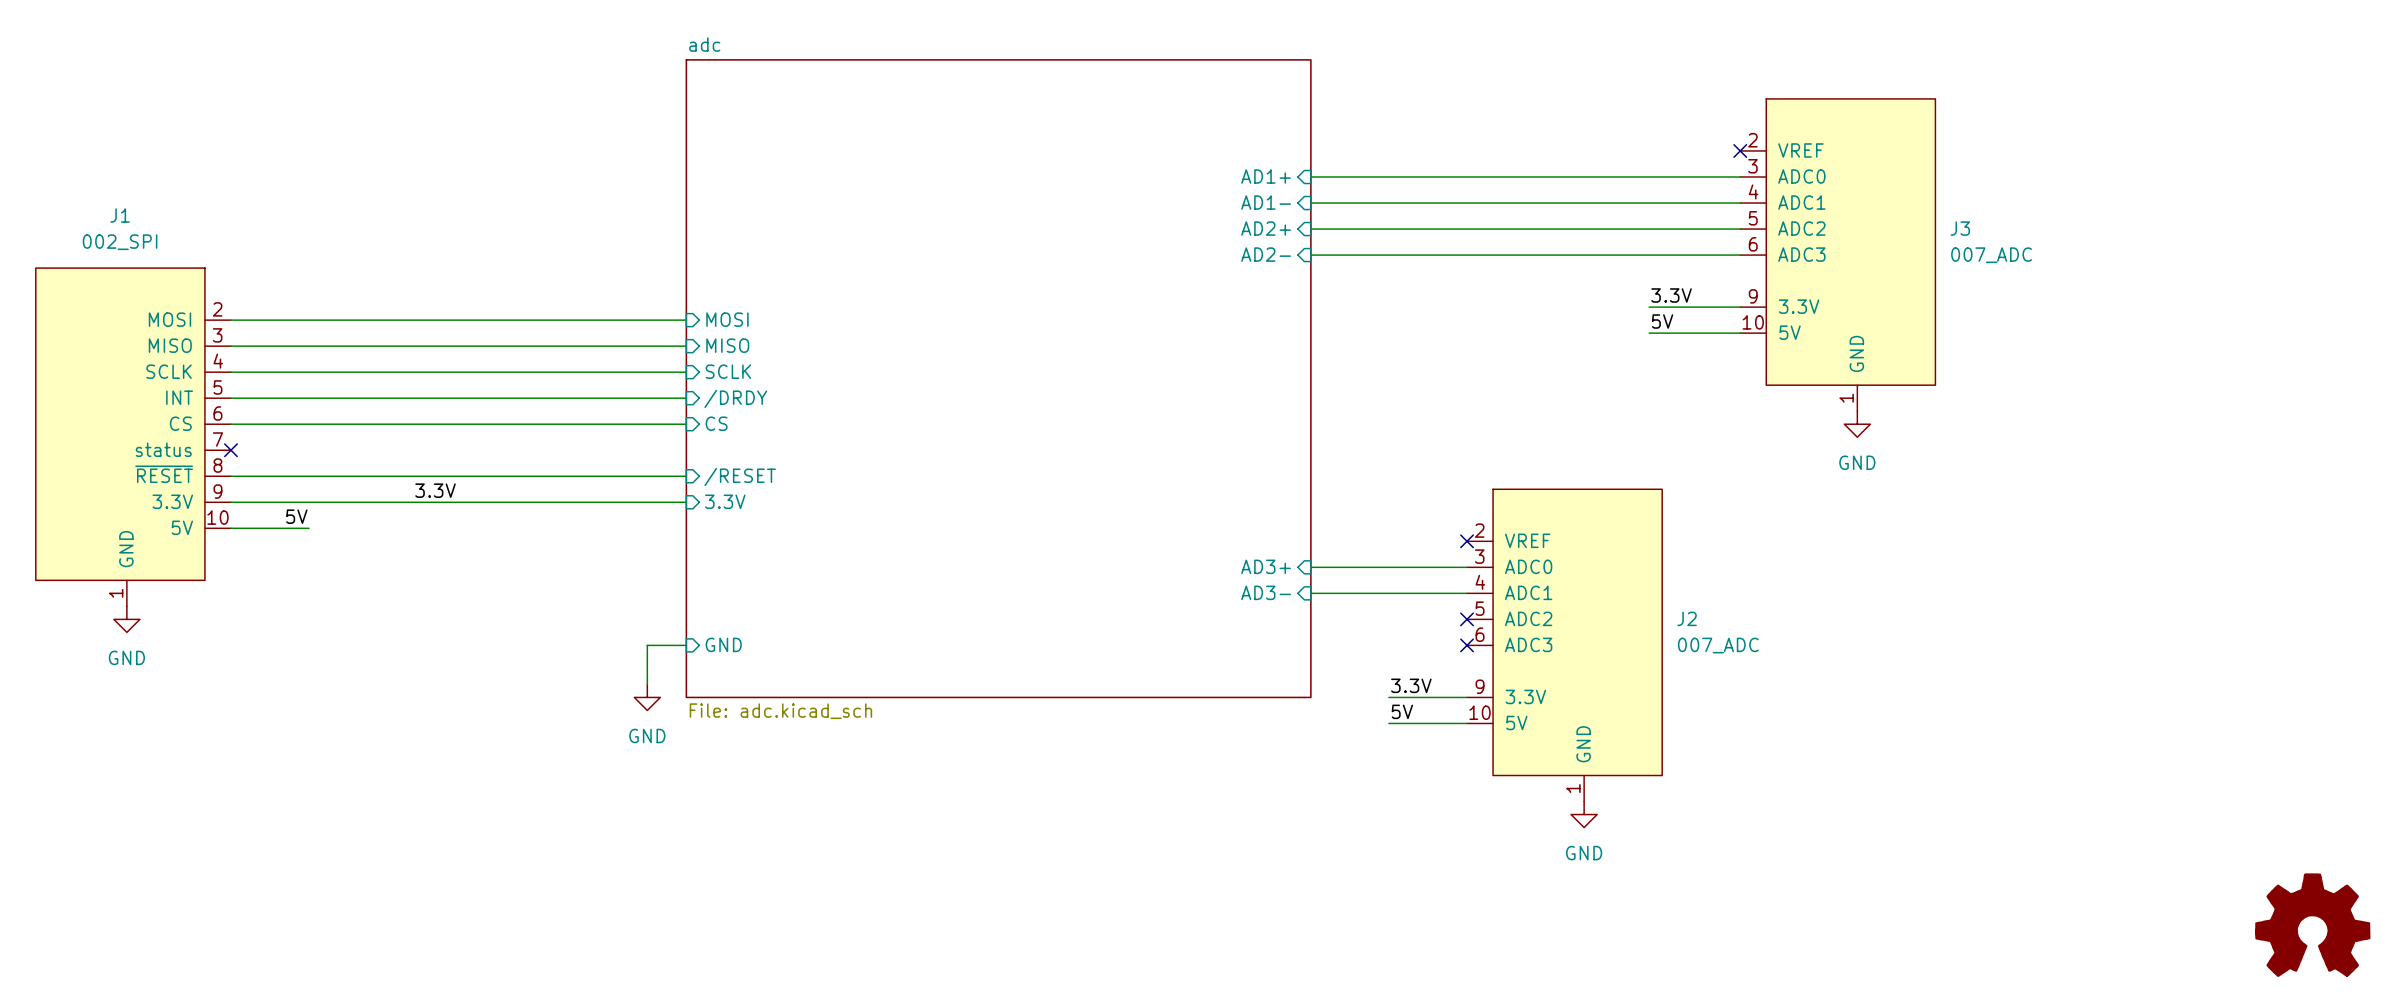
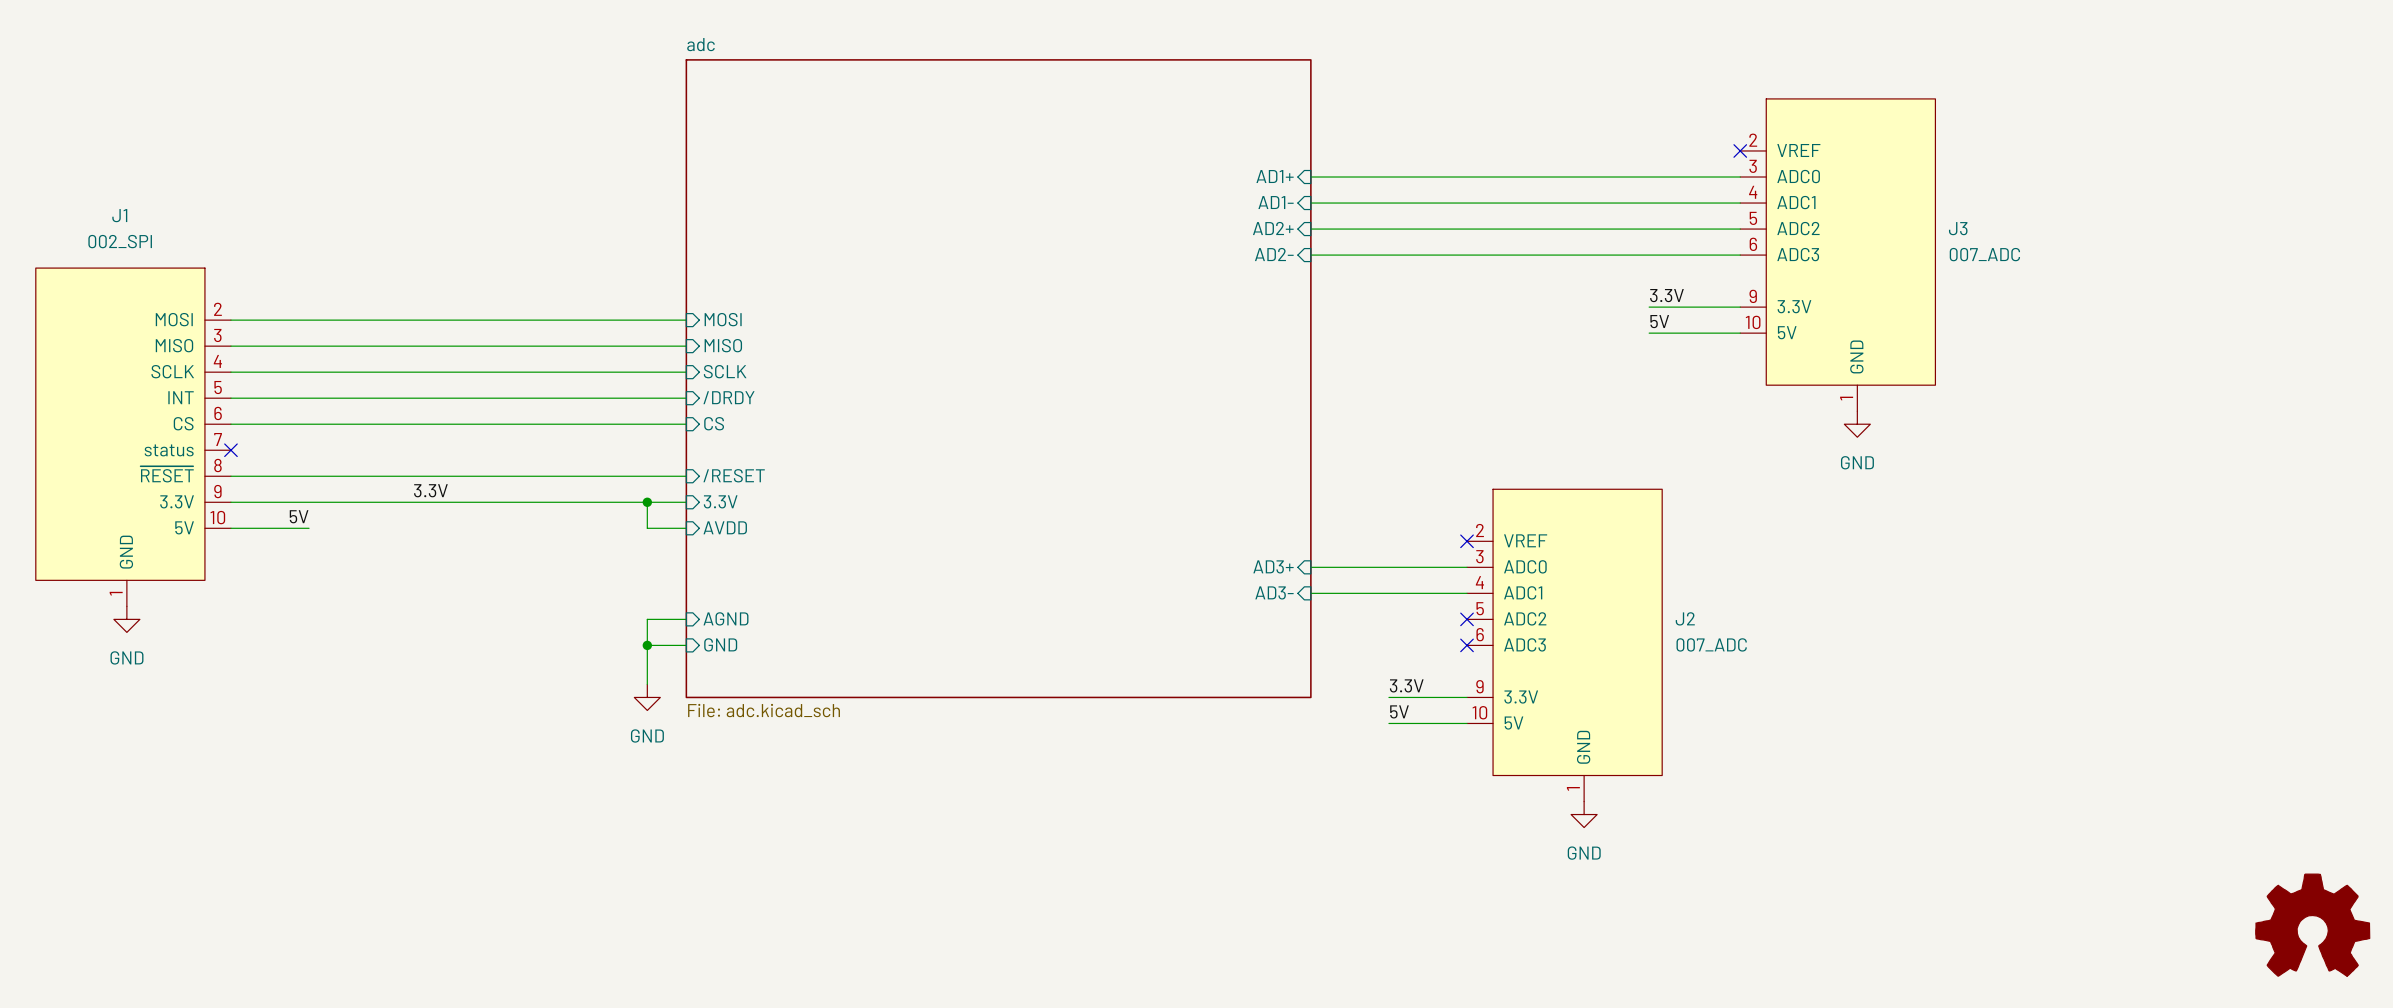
wire: none -> (647, 502) (647, 528) (686, 528)
junction: none -> (647, 502)
sheet pin: none -> AVDD (725, 527)
sheet pin: none -> AGND (725, 618)
wire: none -> (686, 619) (647, 619) (647, 645)
junction: none -> (647, 645)

